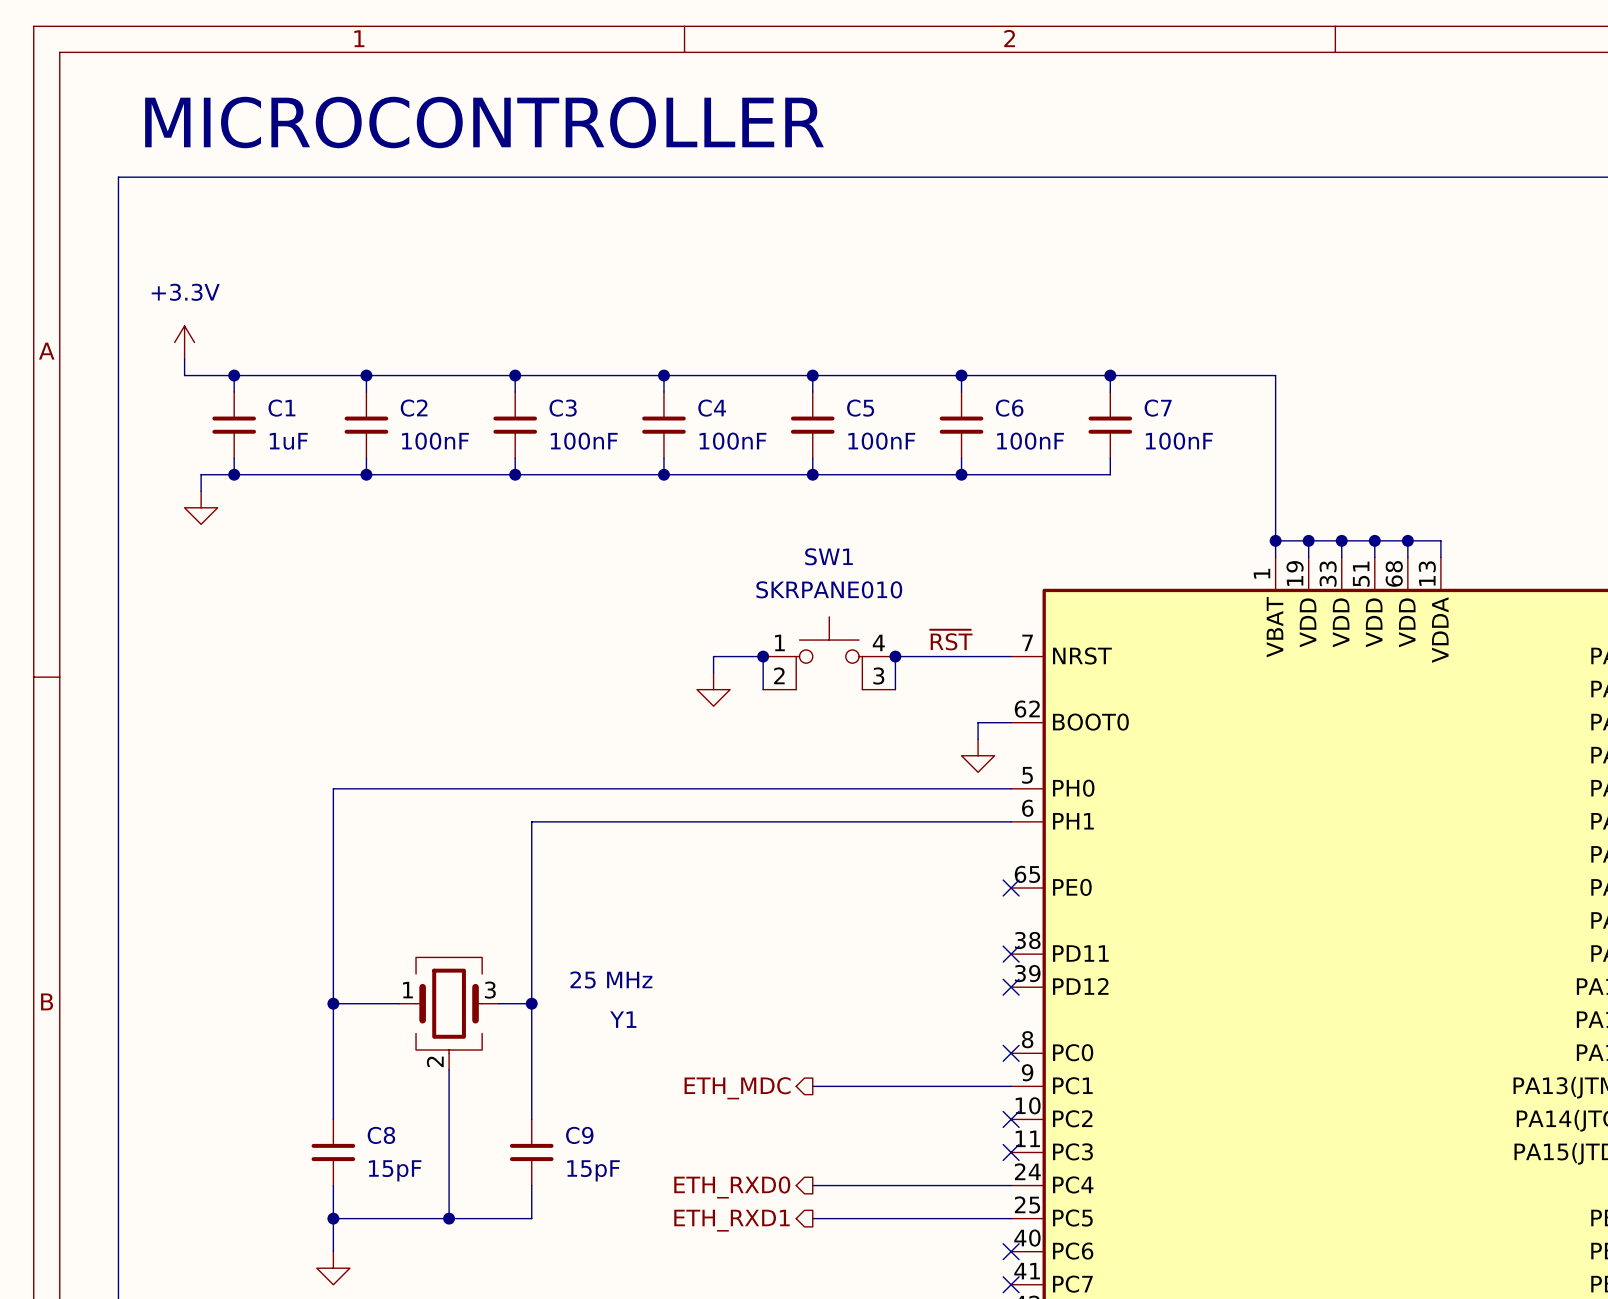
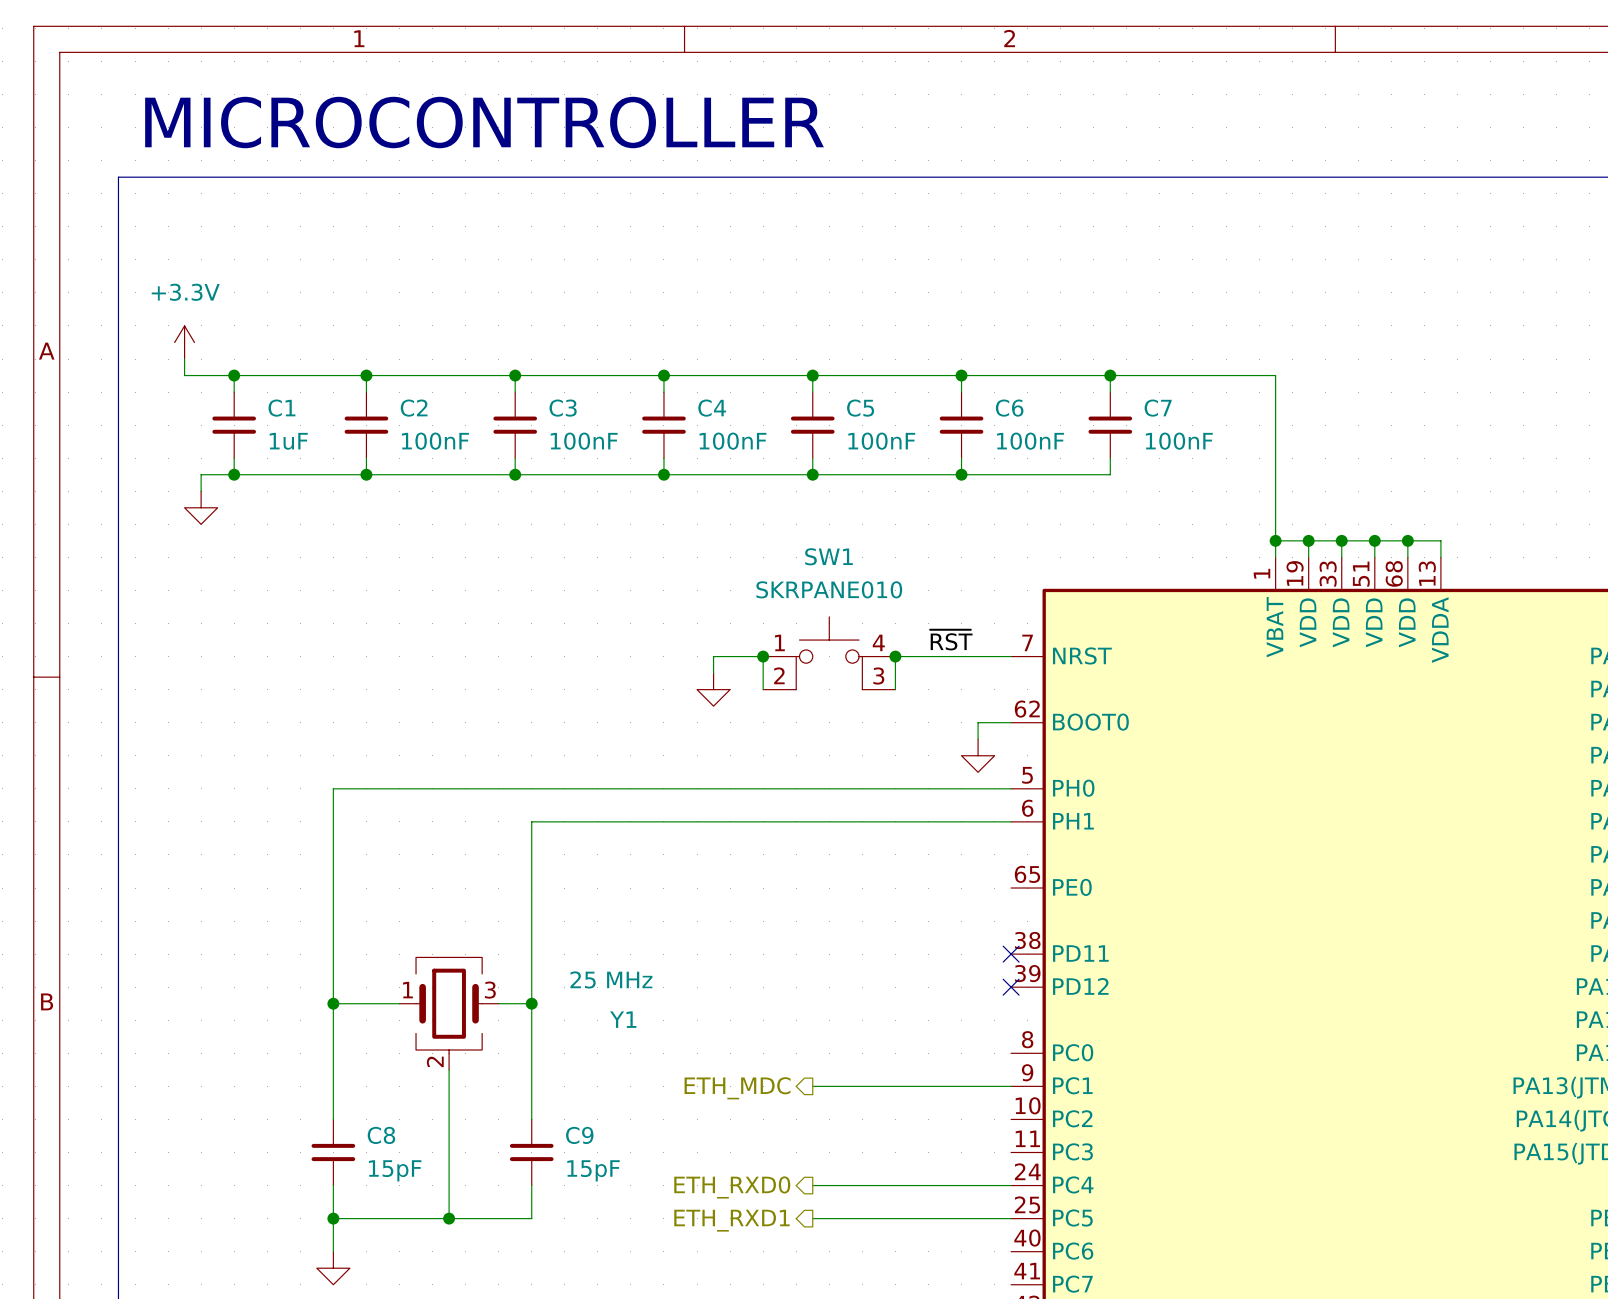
no-connect mark: (1011, 888) -> none
no-connect mark: (1011, 1053) -> none
no-connect mark: (1011, 1119) -> none
no-connect mark: (1011, 1152) -> none
no-connect mark: (1011, 1251) -> none
no-connect mark: (1011, 1284) -> none

